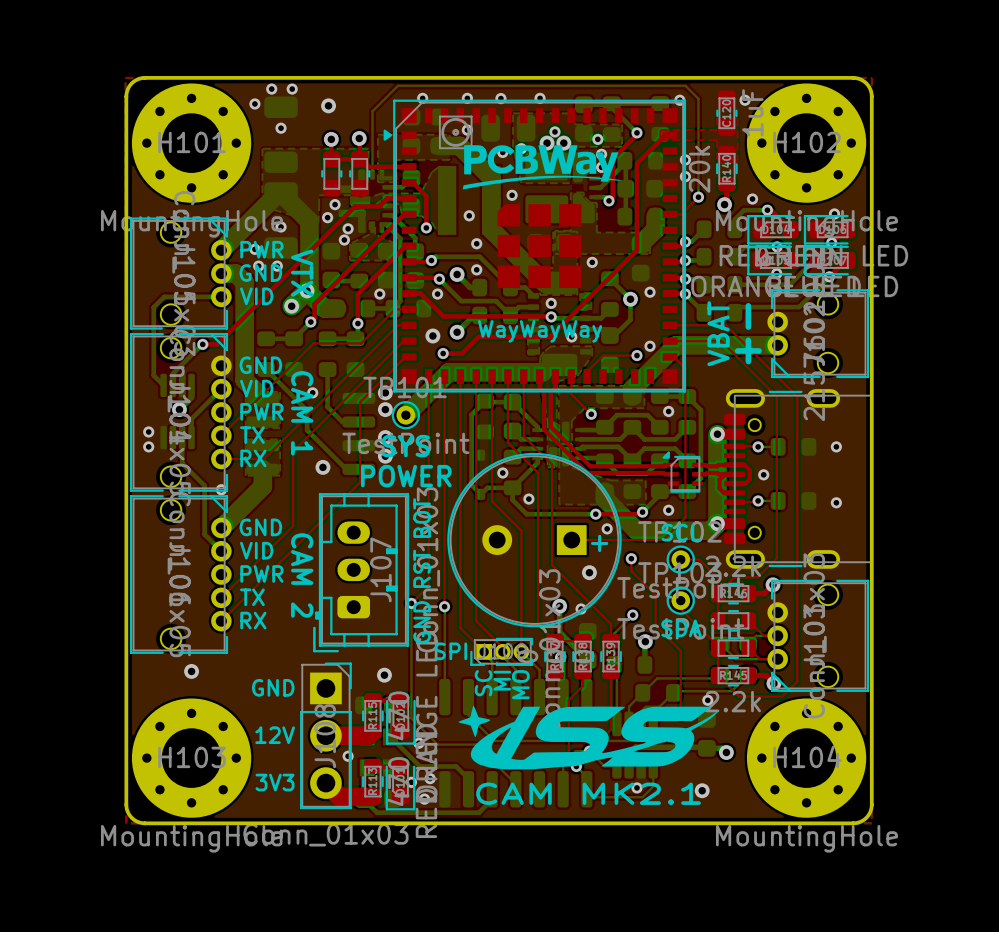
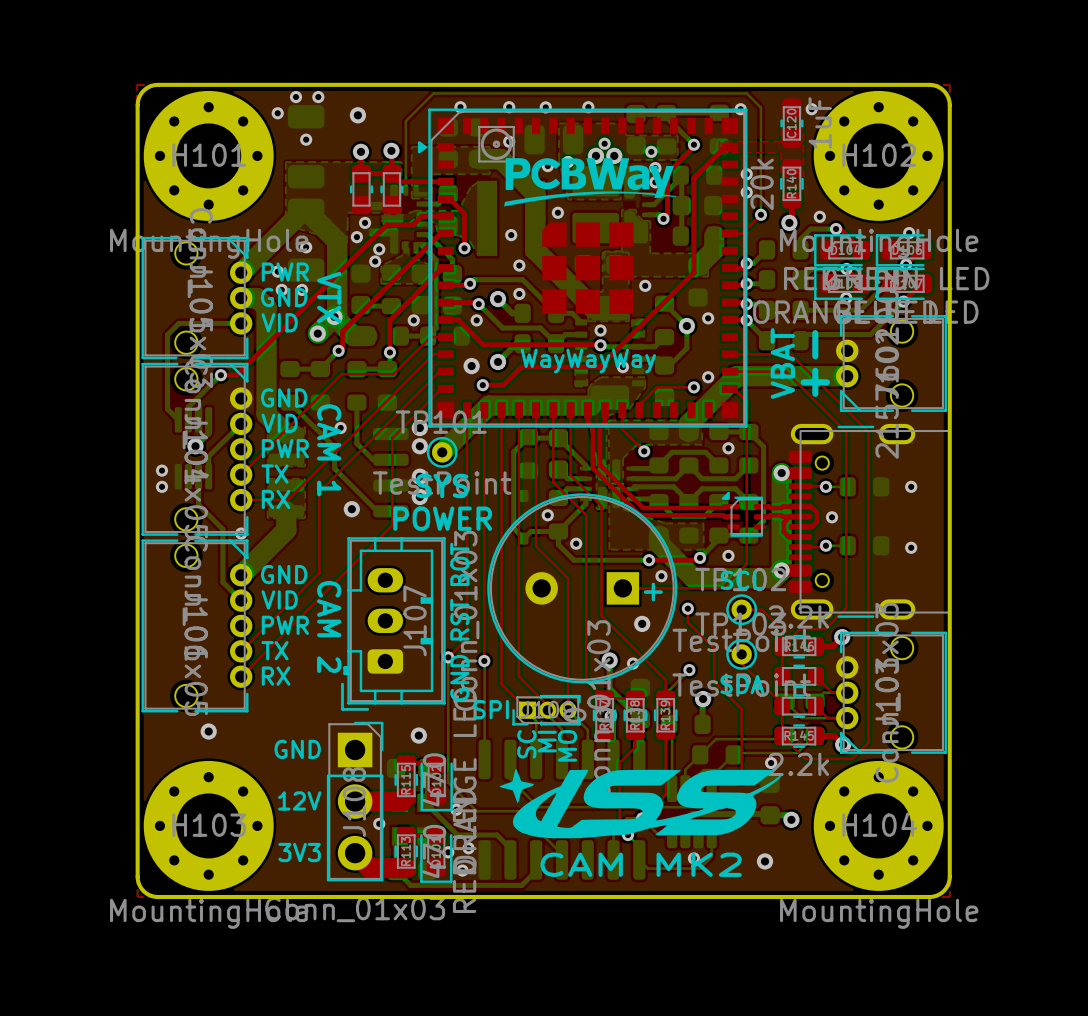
text: CAM MK2.1 (588, 793) -> CAM MK2 (641, 864)

